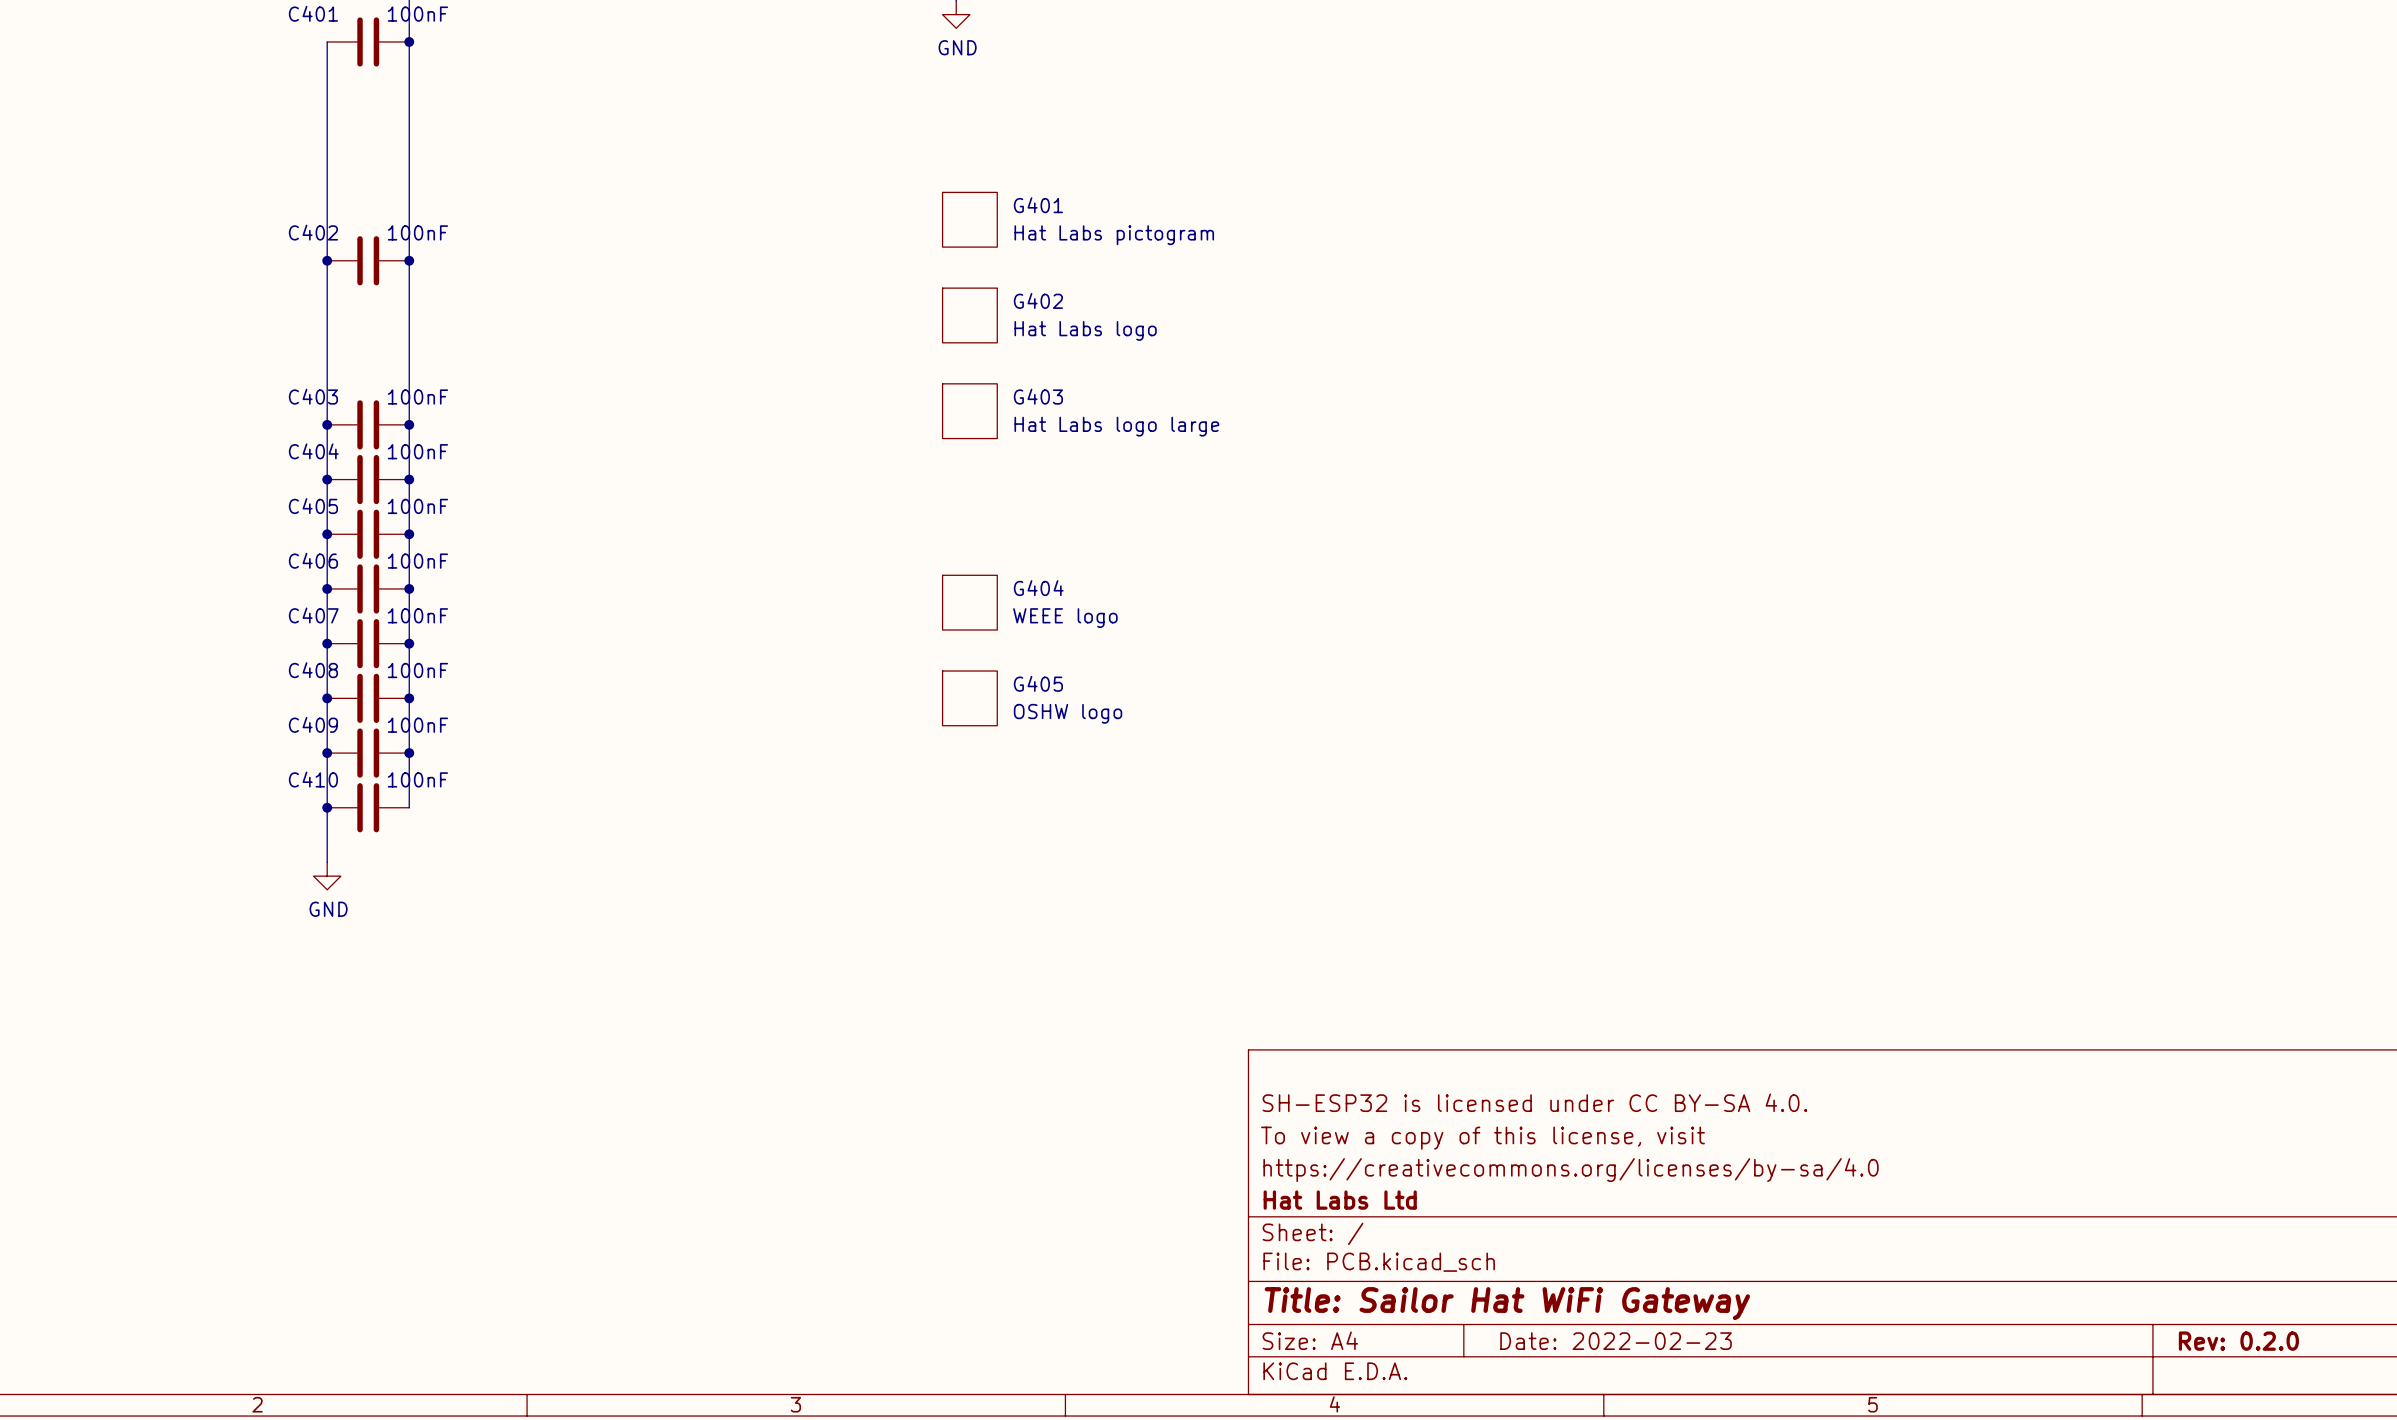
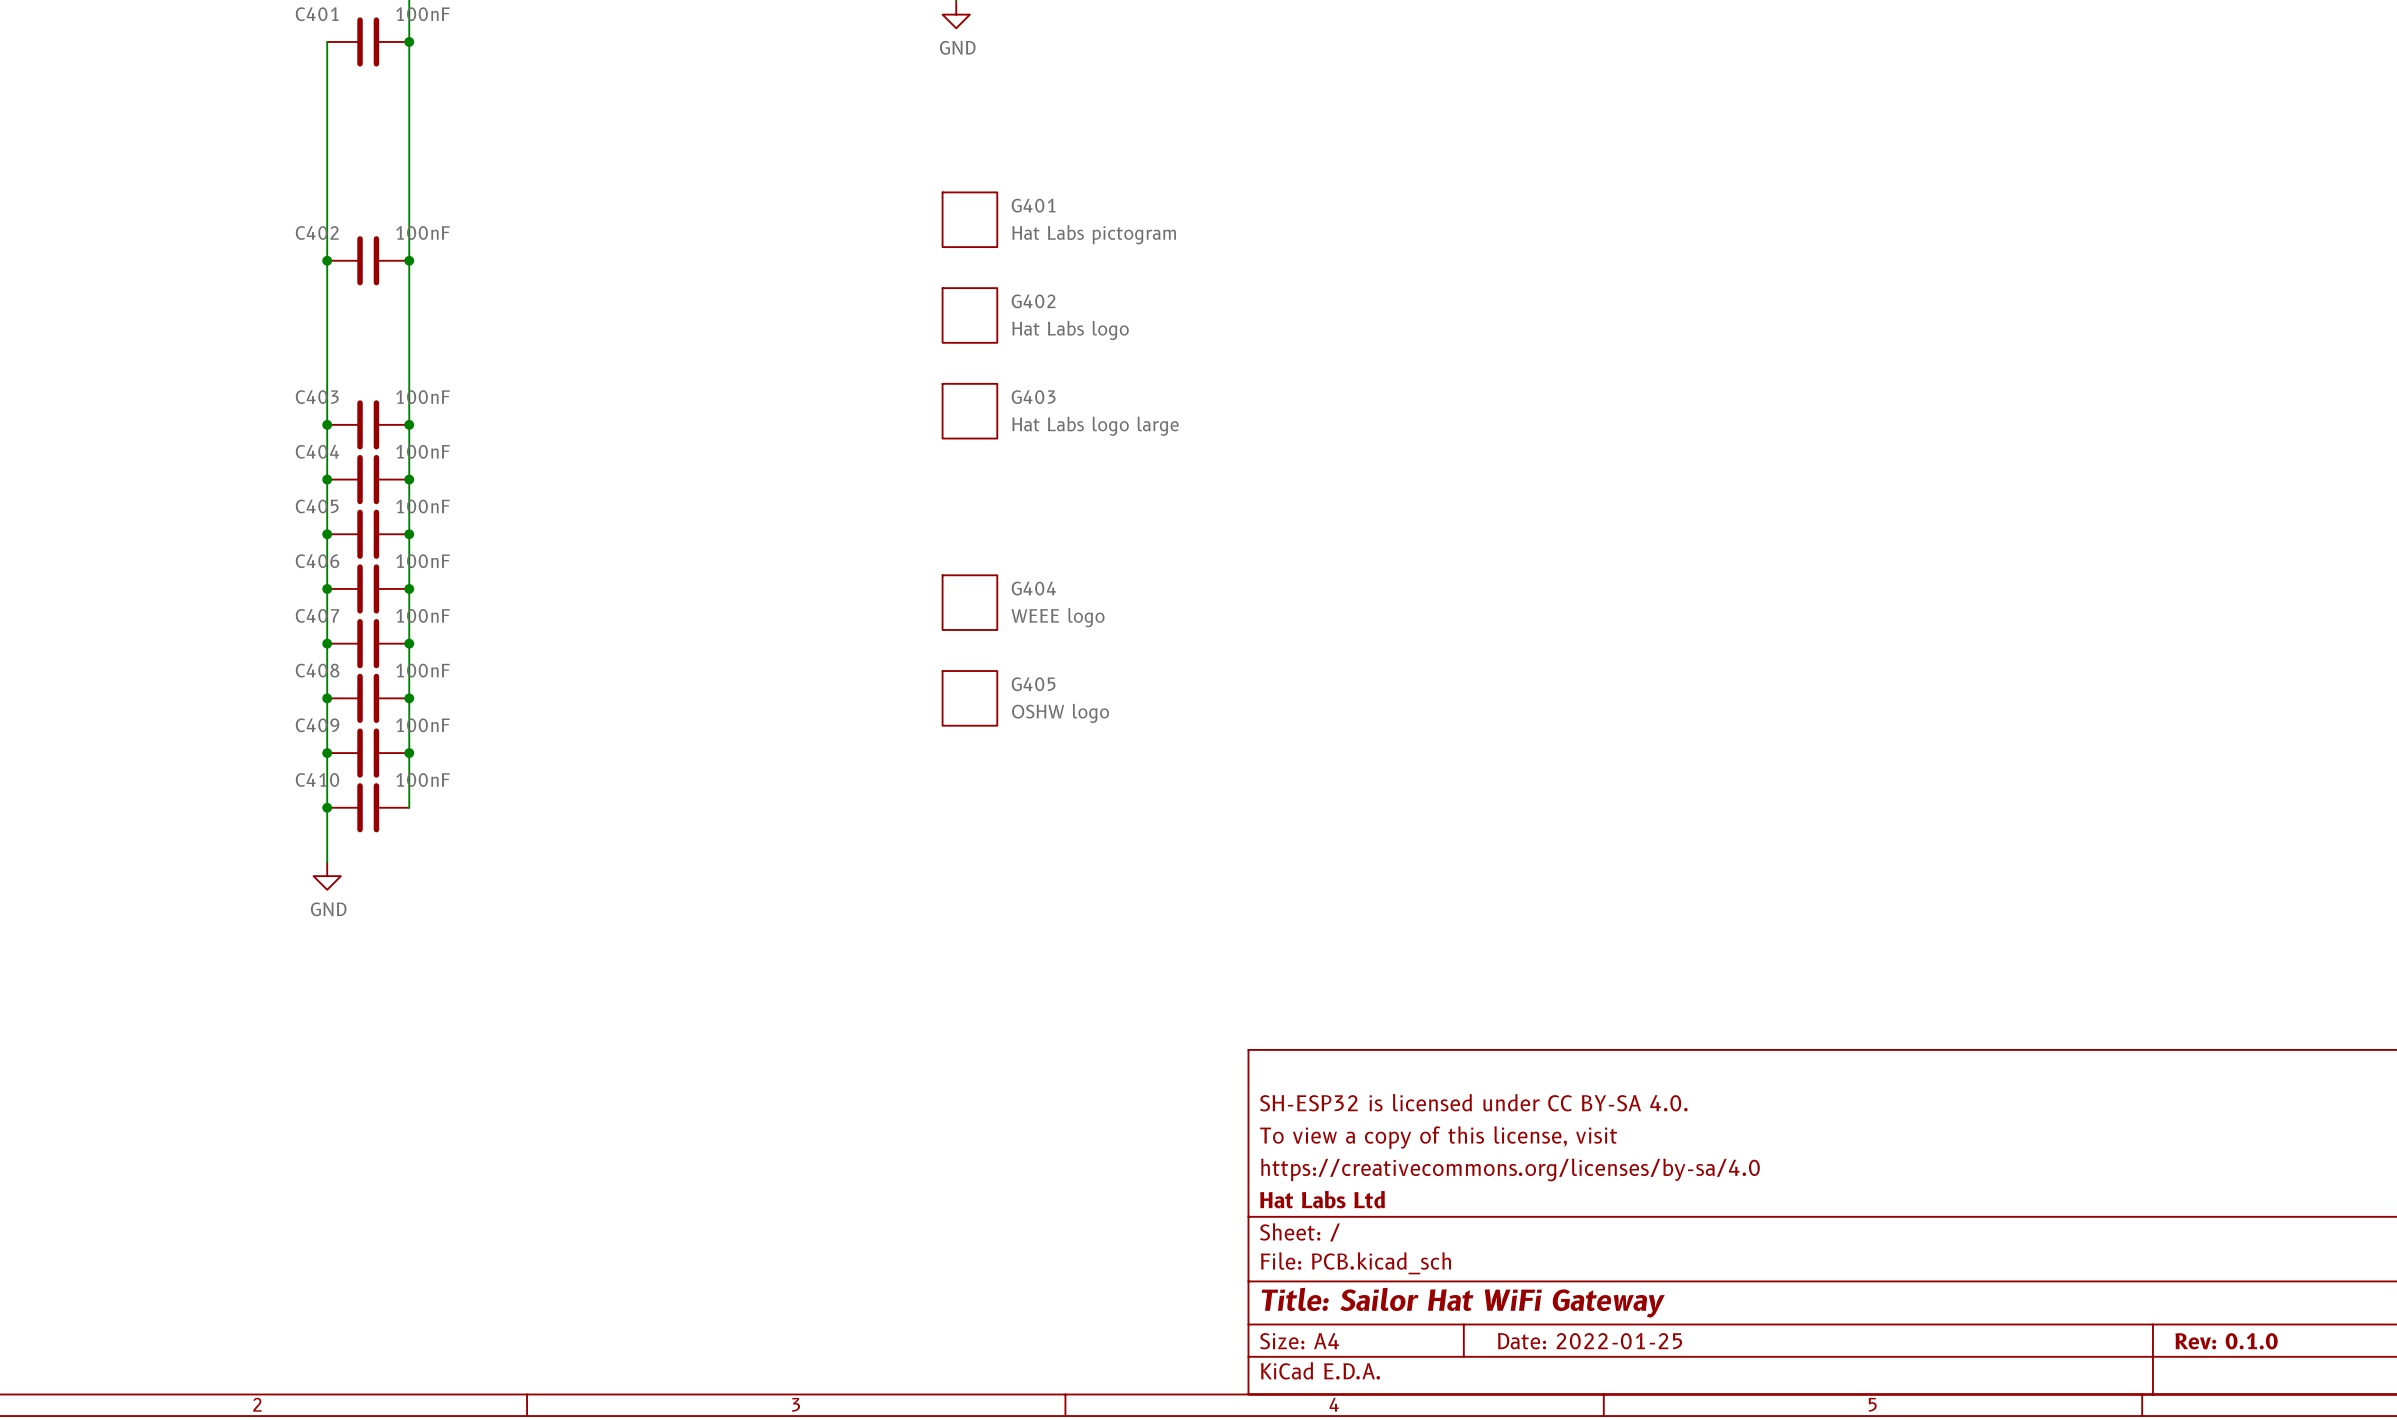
title block: Date: 2022-02-23 (1616, 1341) -> Date: 2022-01-25 (1590, 1341)
title block: Rev: 0.2.0 (2238, 1341) -> Rev: 0.1.0 (2226, 1341)

